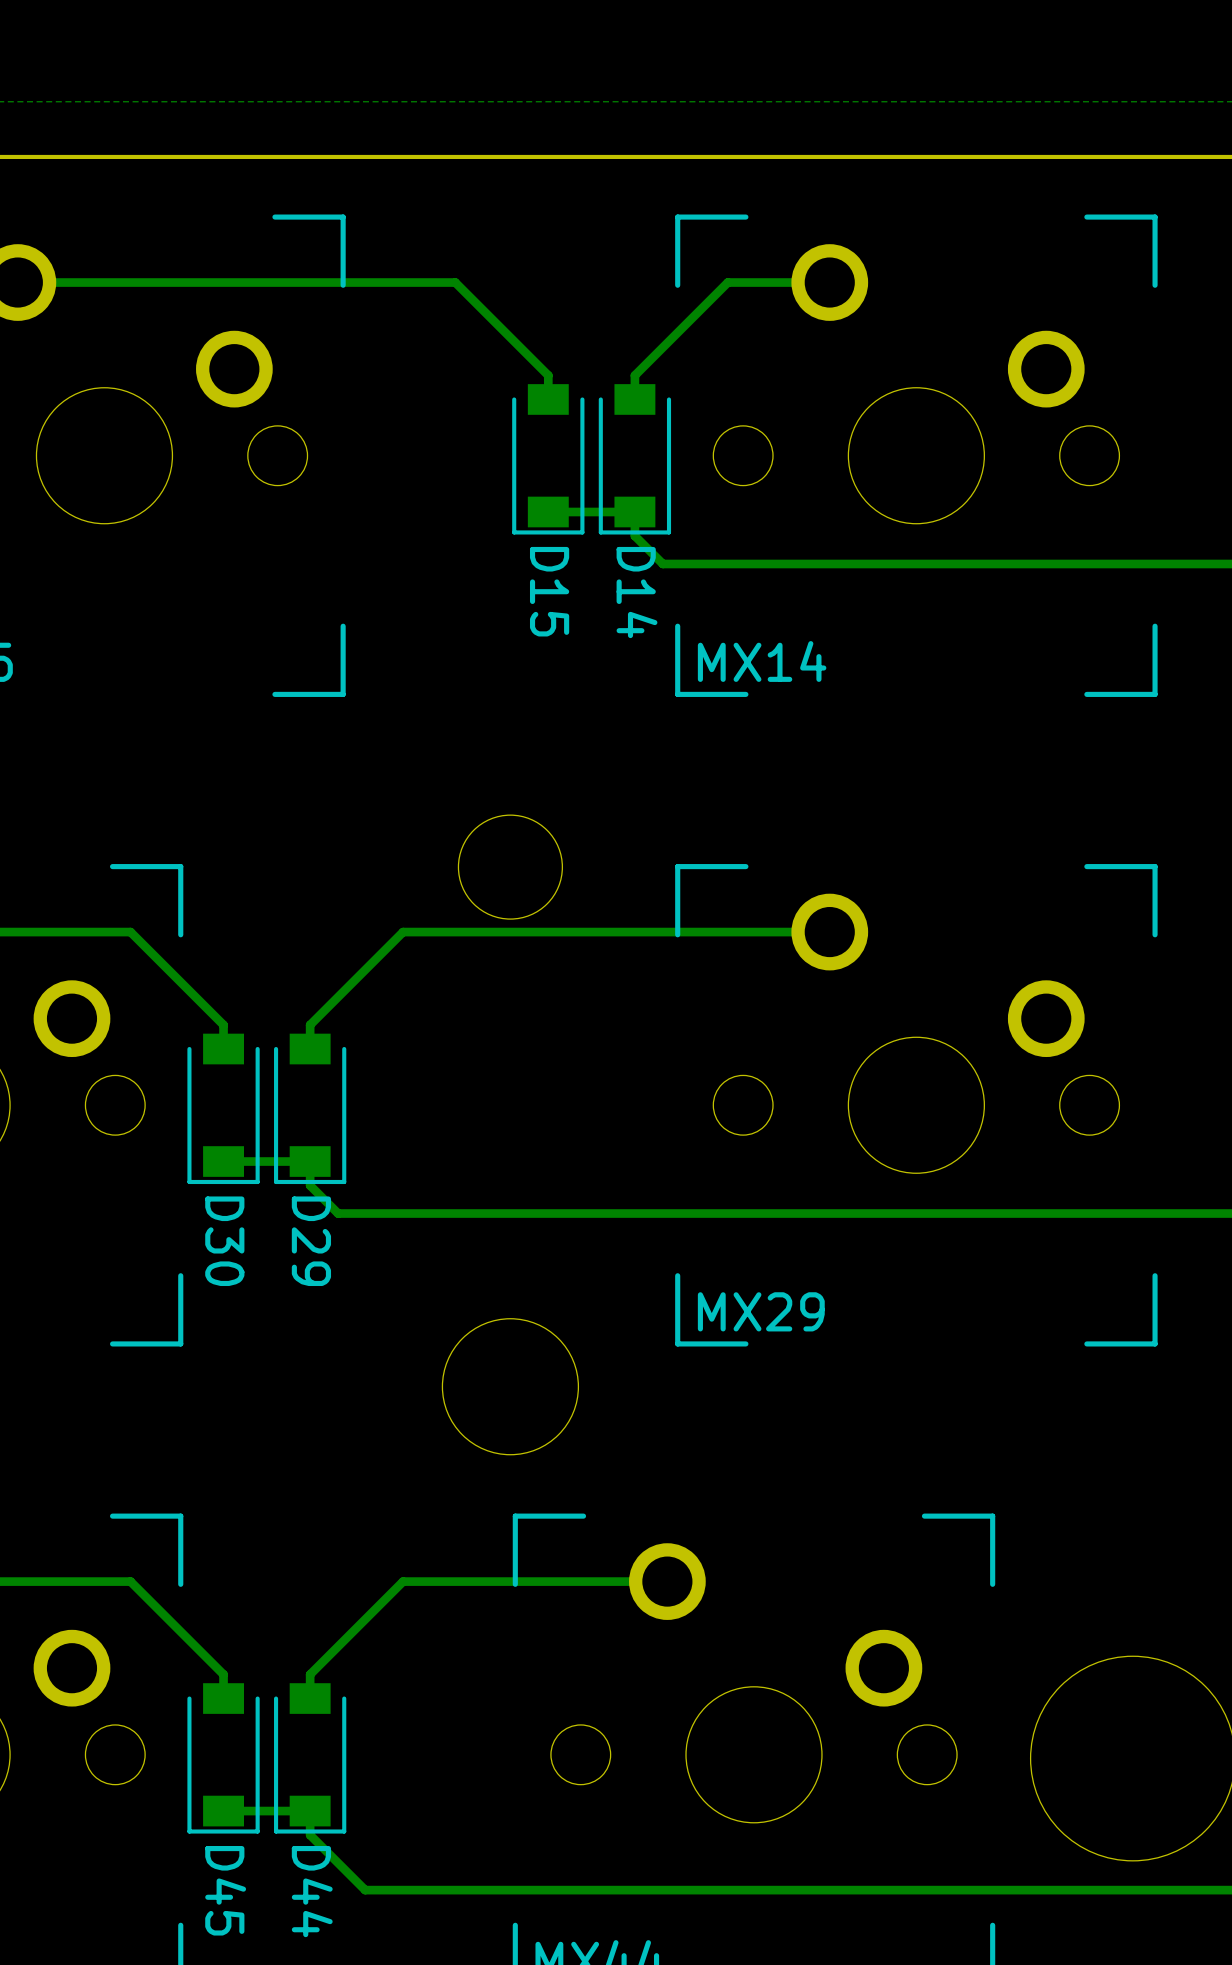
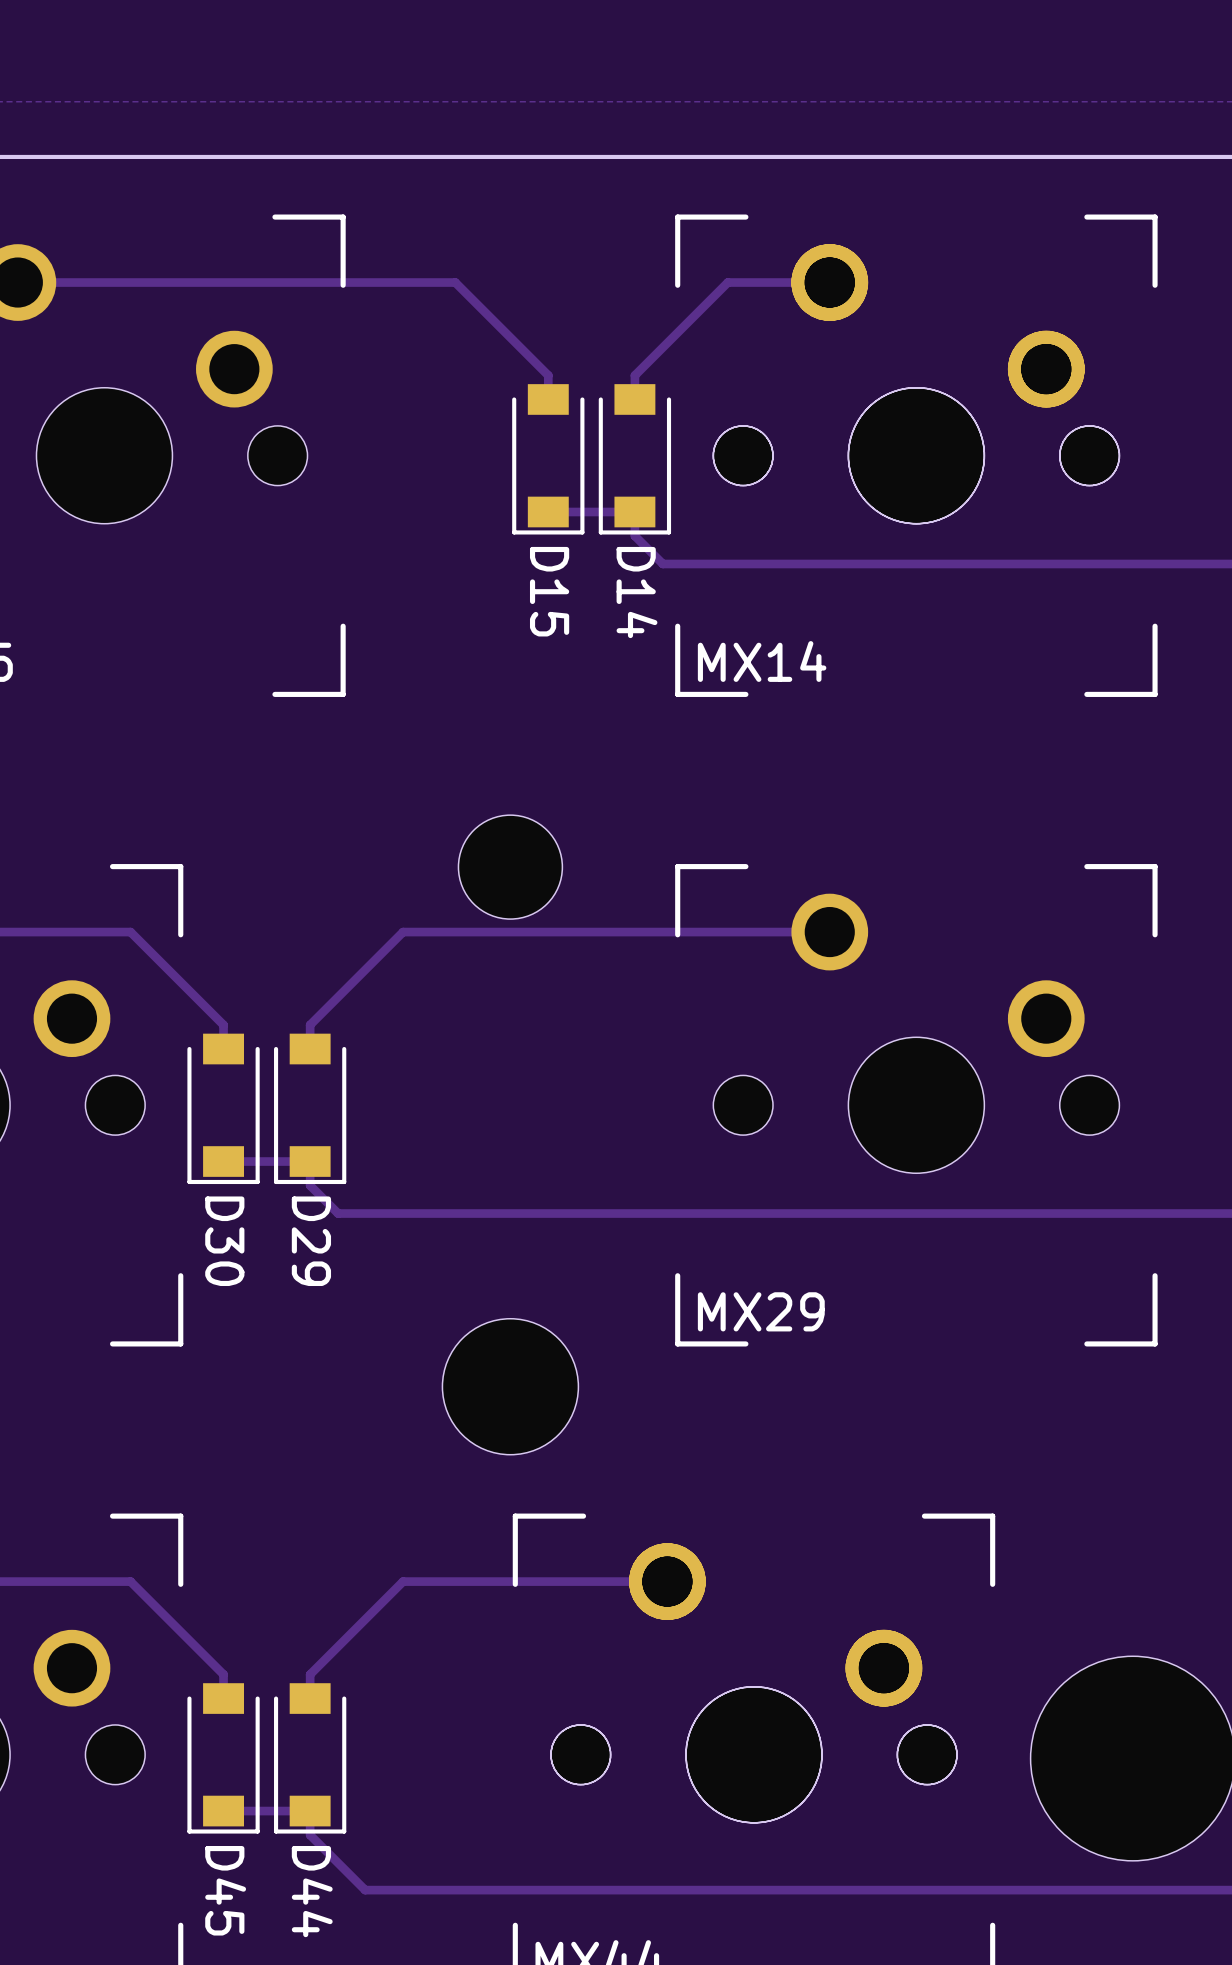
part: none -> (916, 383)
part: none -> (753, 1683)

